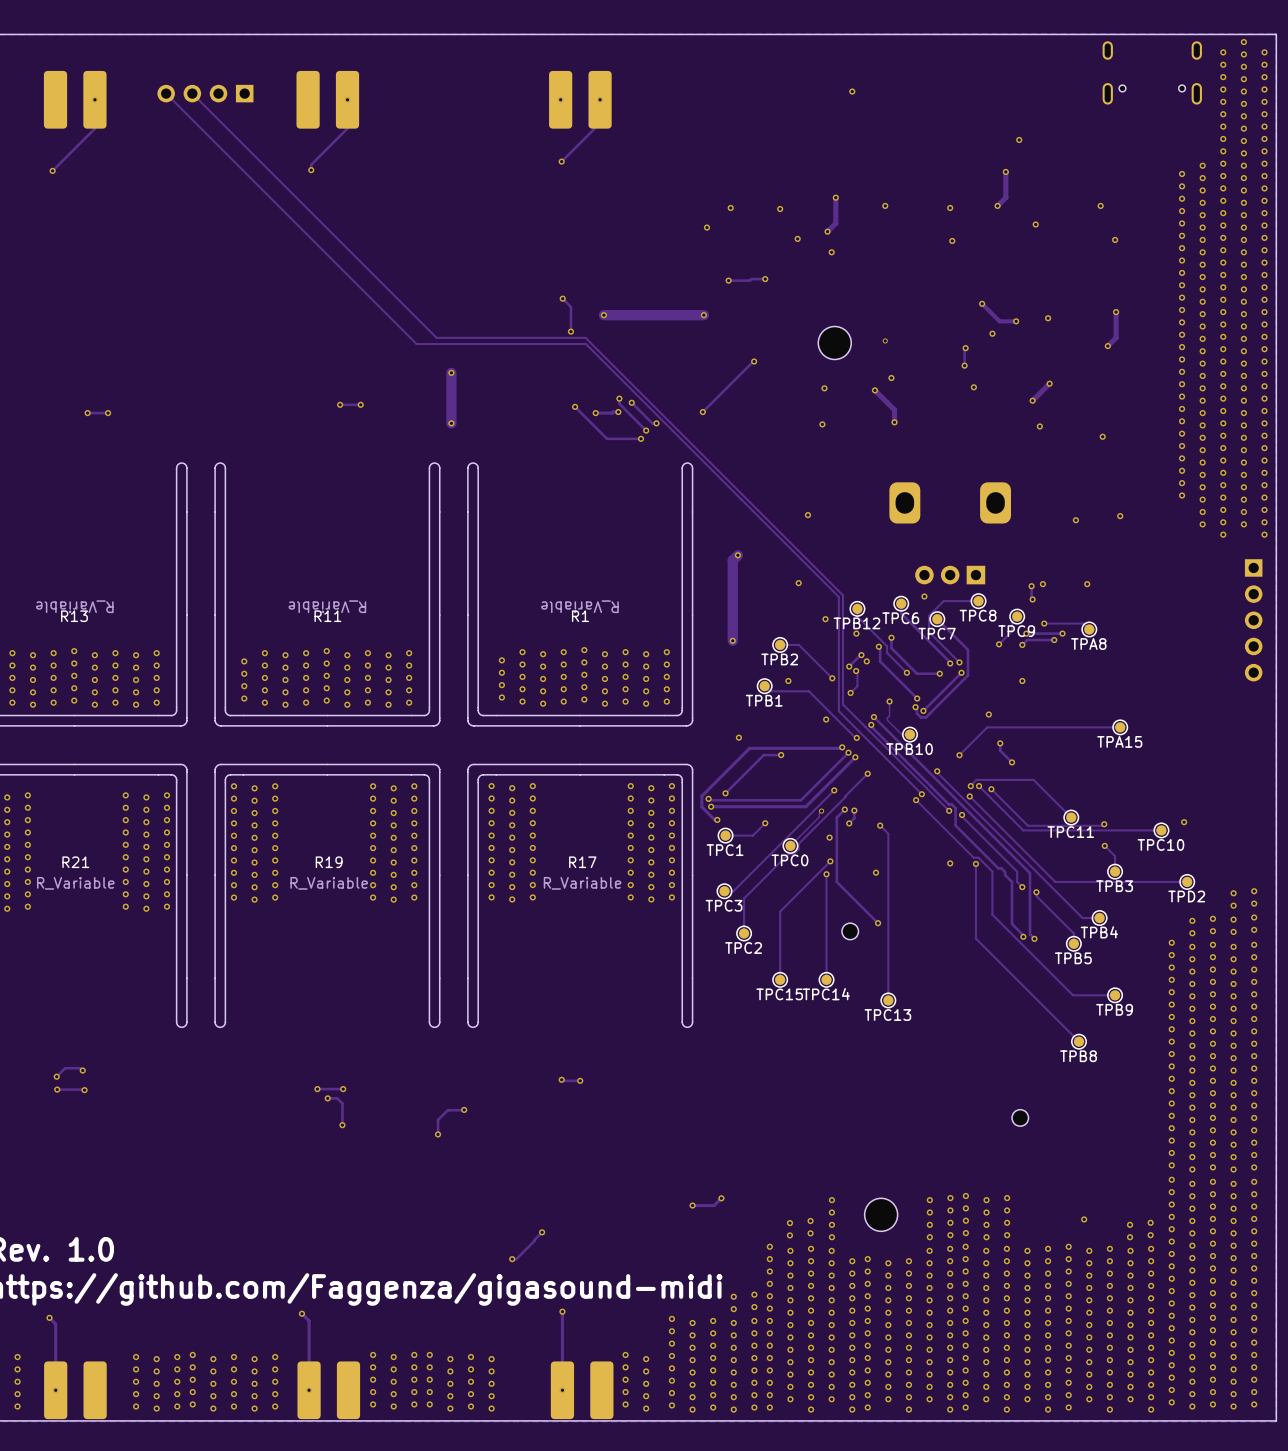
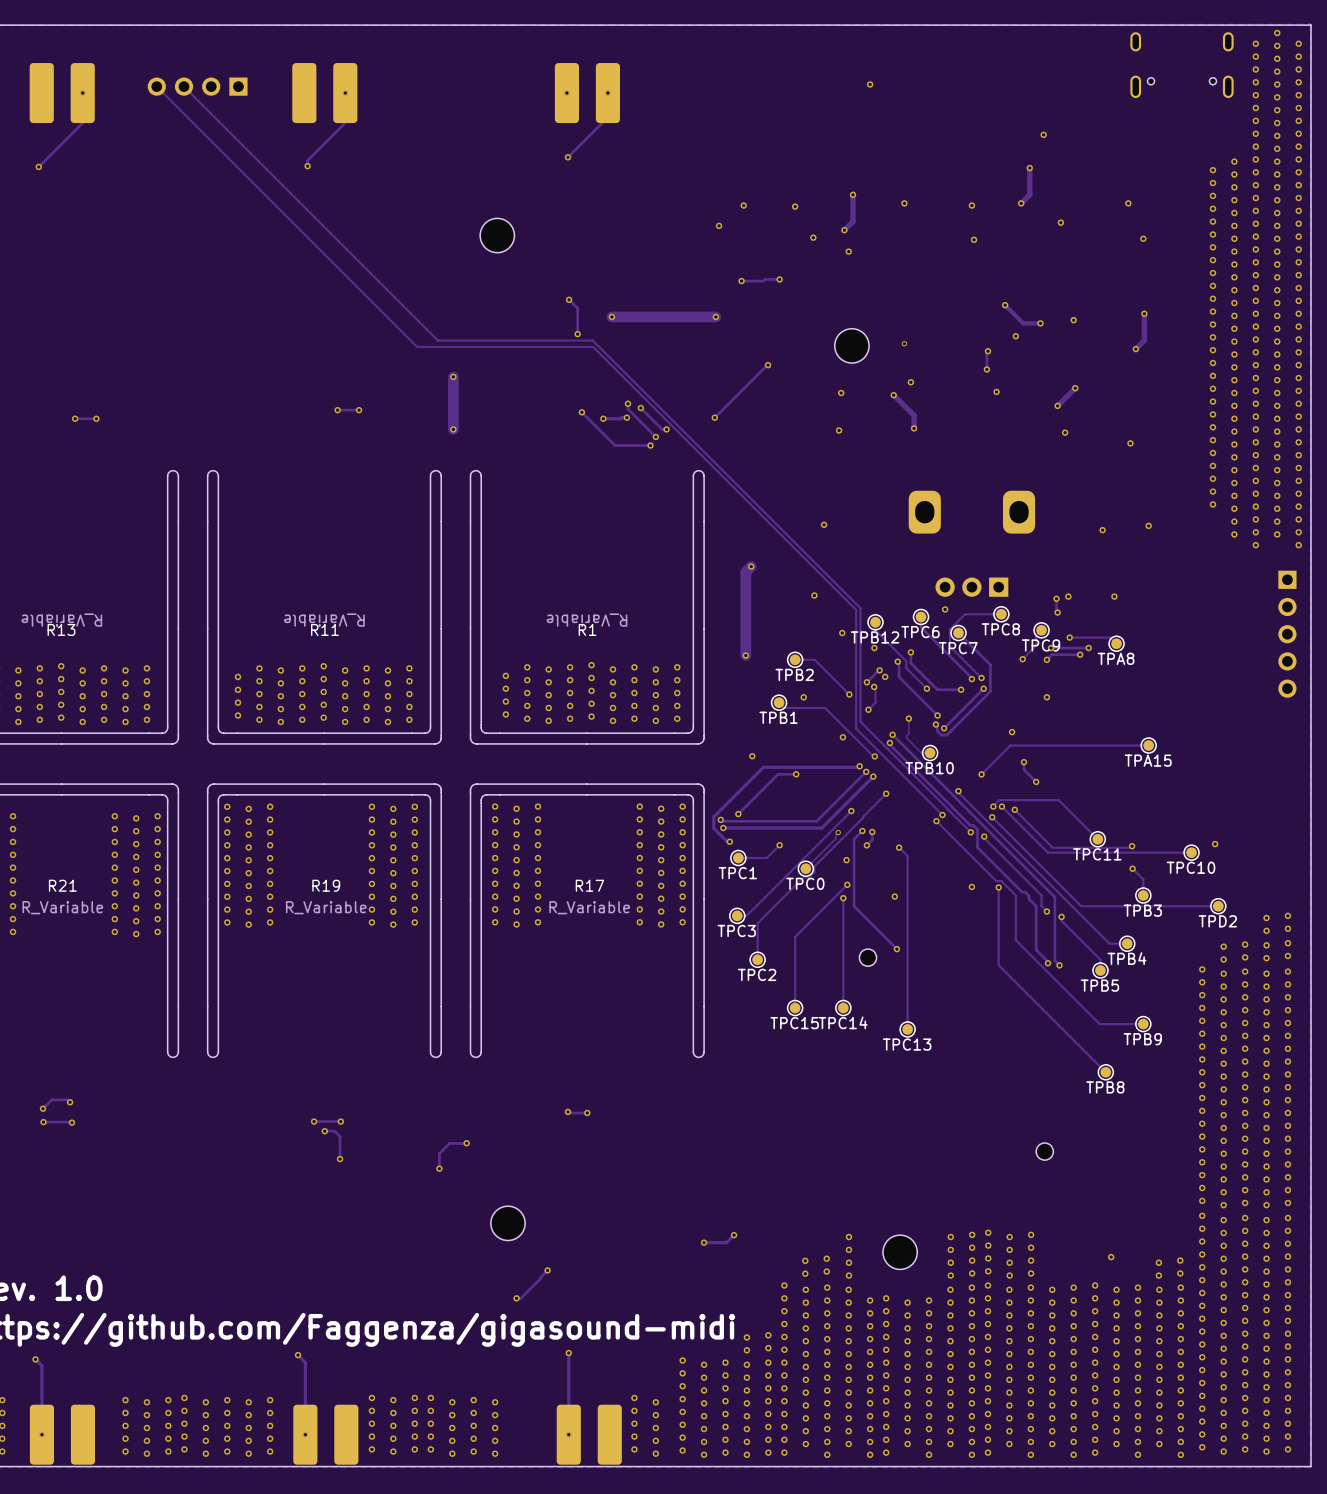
part: none -> (497, 235)
part: none -> (508, 1223)

